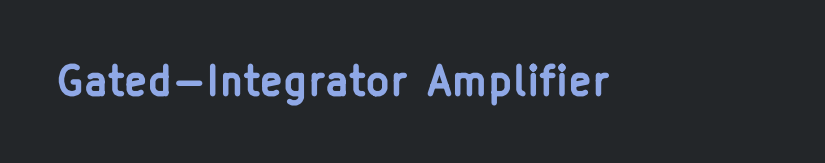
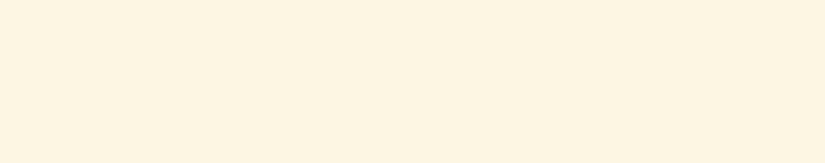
text: Gated-Integrator Amplifier (333, 84) -> none

